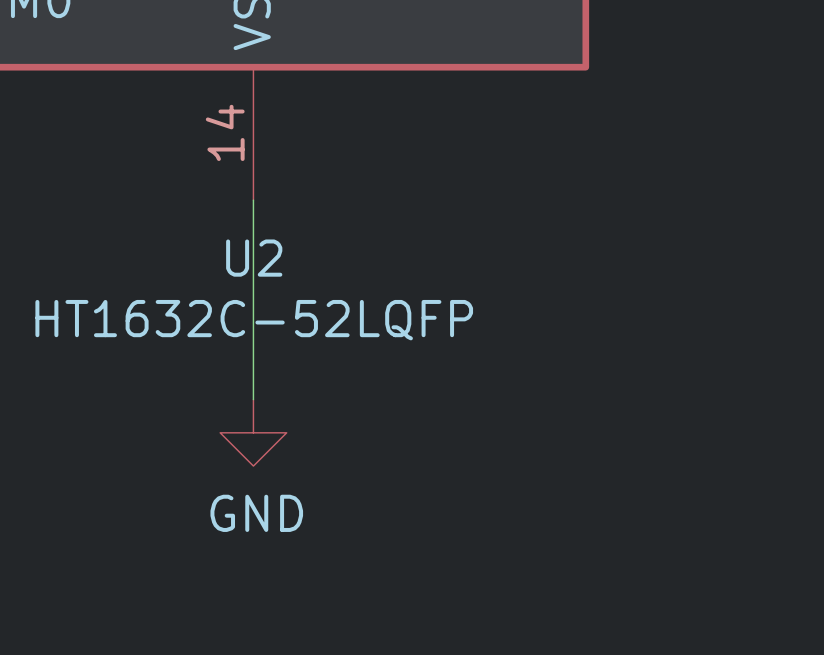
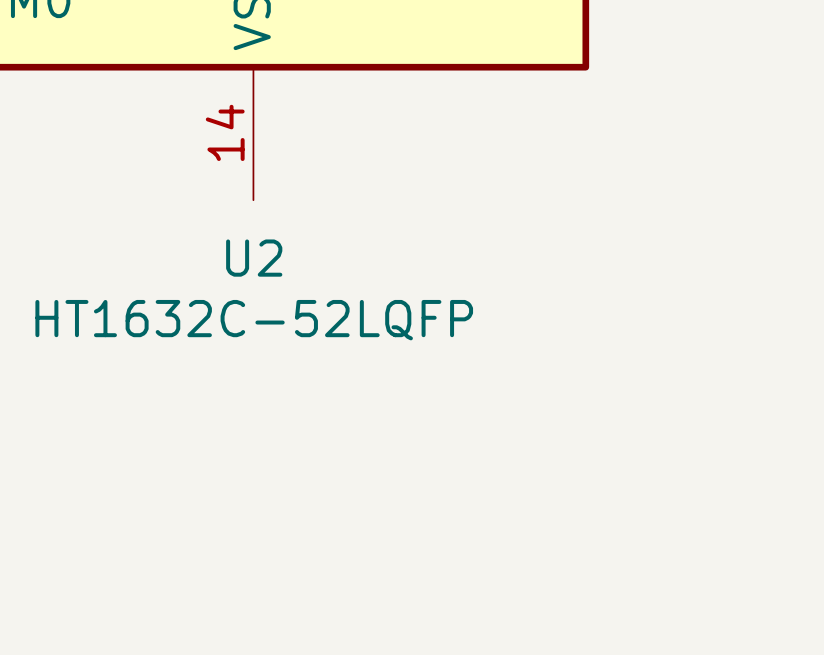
wire: (253, 200) (253, 399) -> none
power symbol: GND (253, 432) -> none

